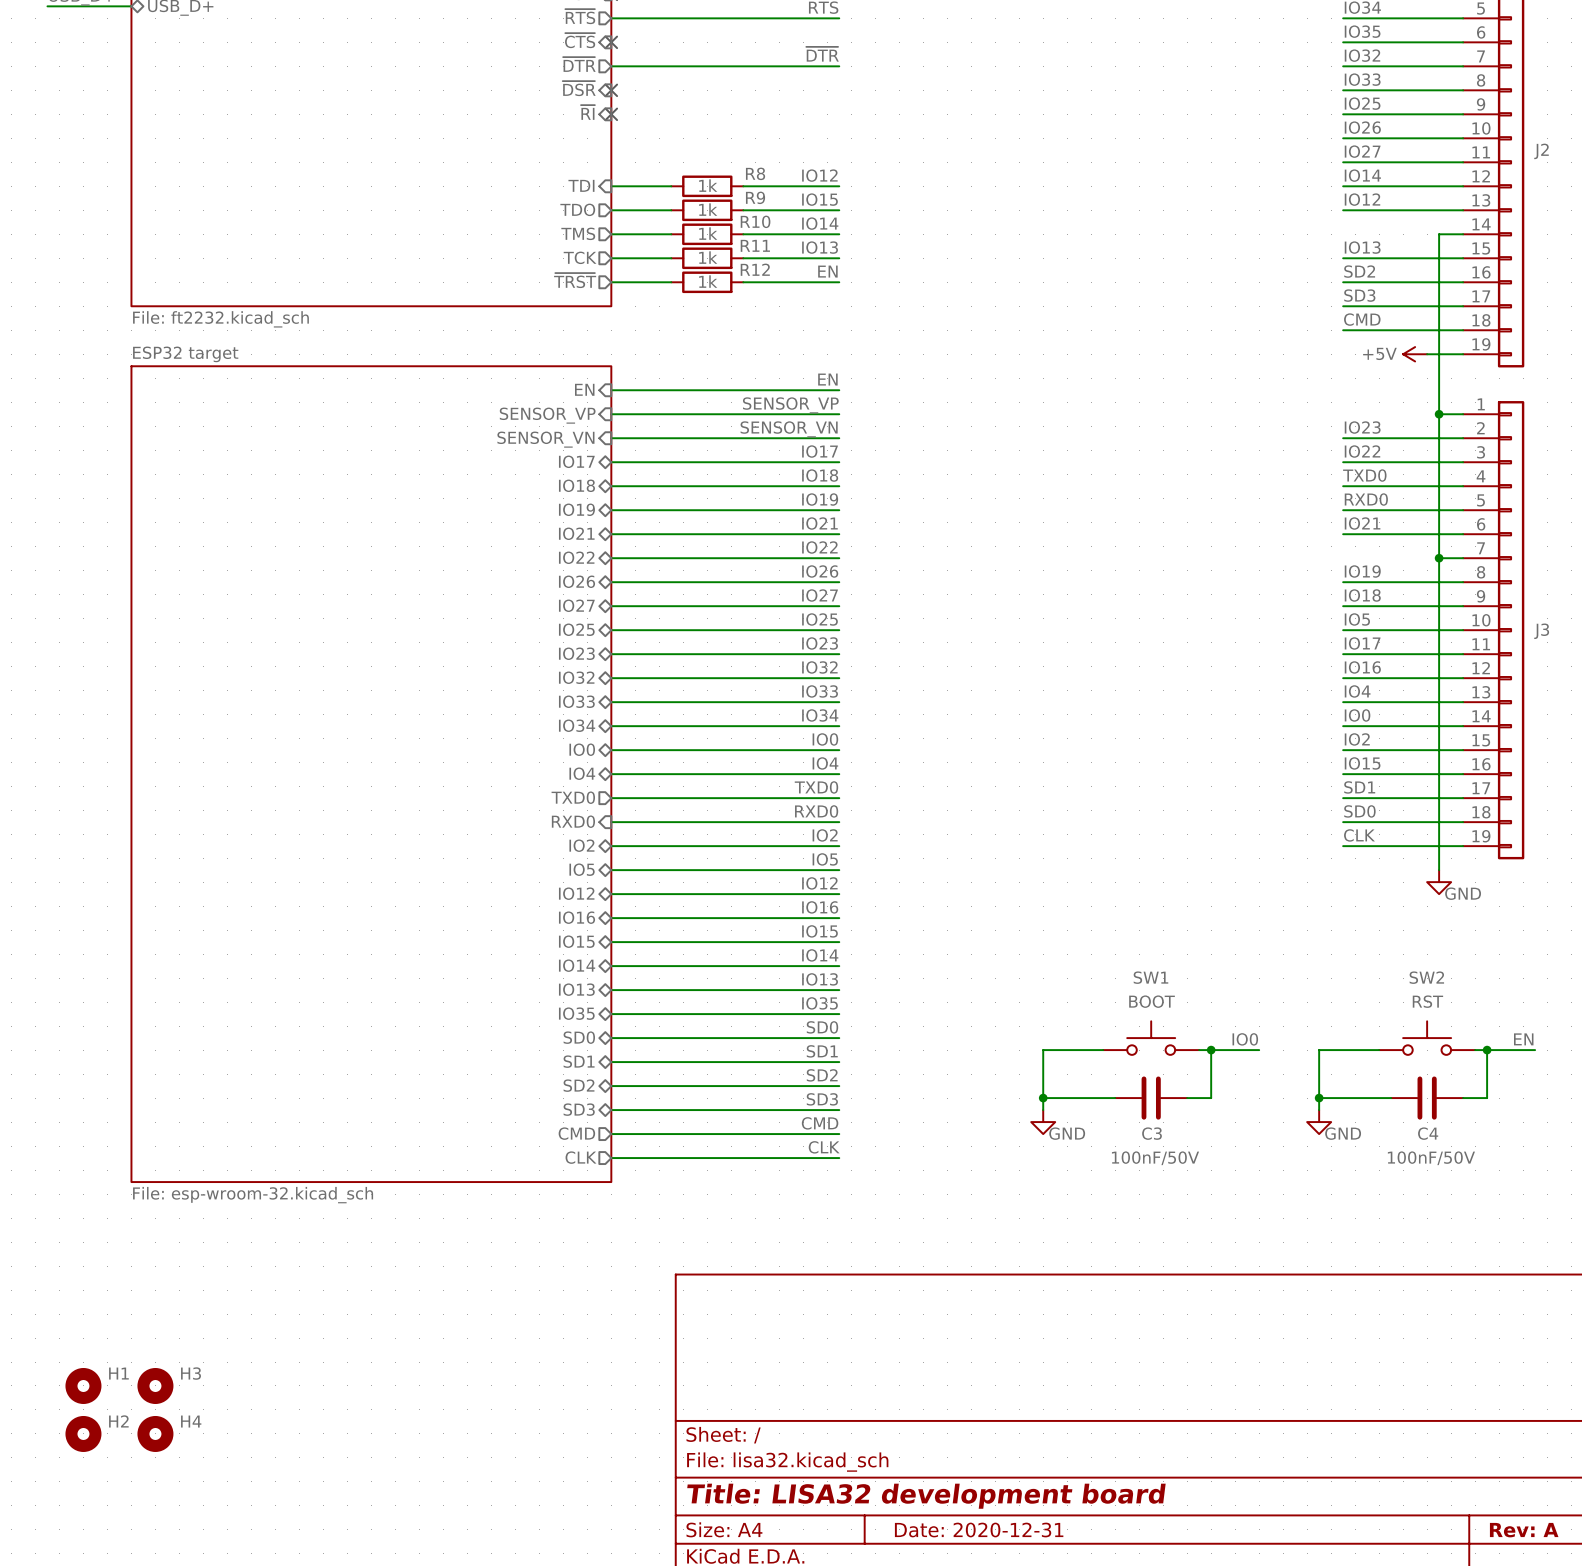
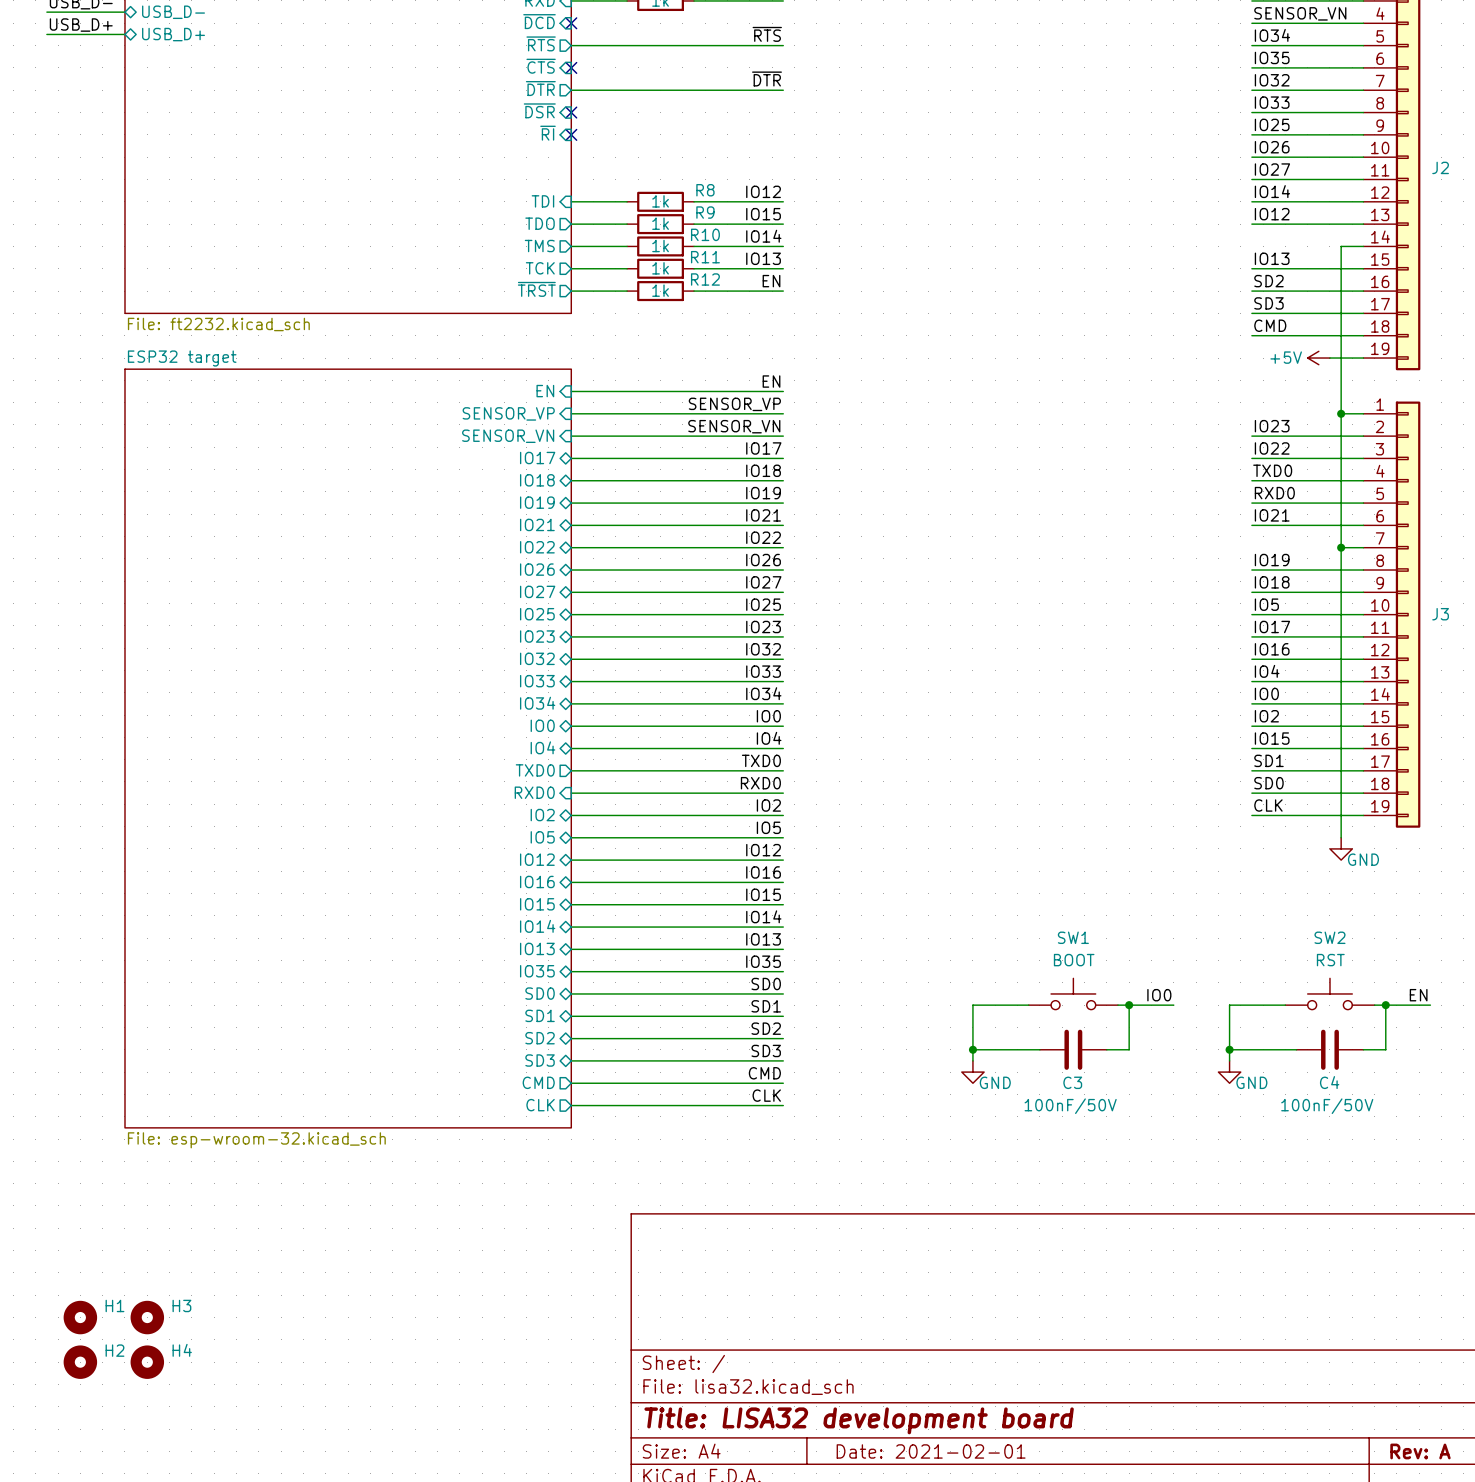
title block: Date: 2020-12-31 (979, 1530) -> Date: 2021-02-01 (931, 1451)

